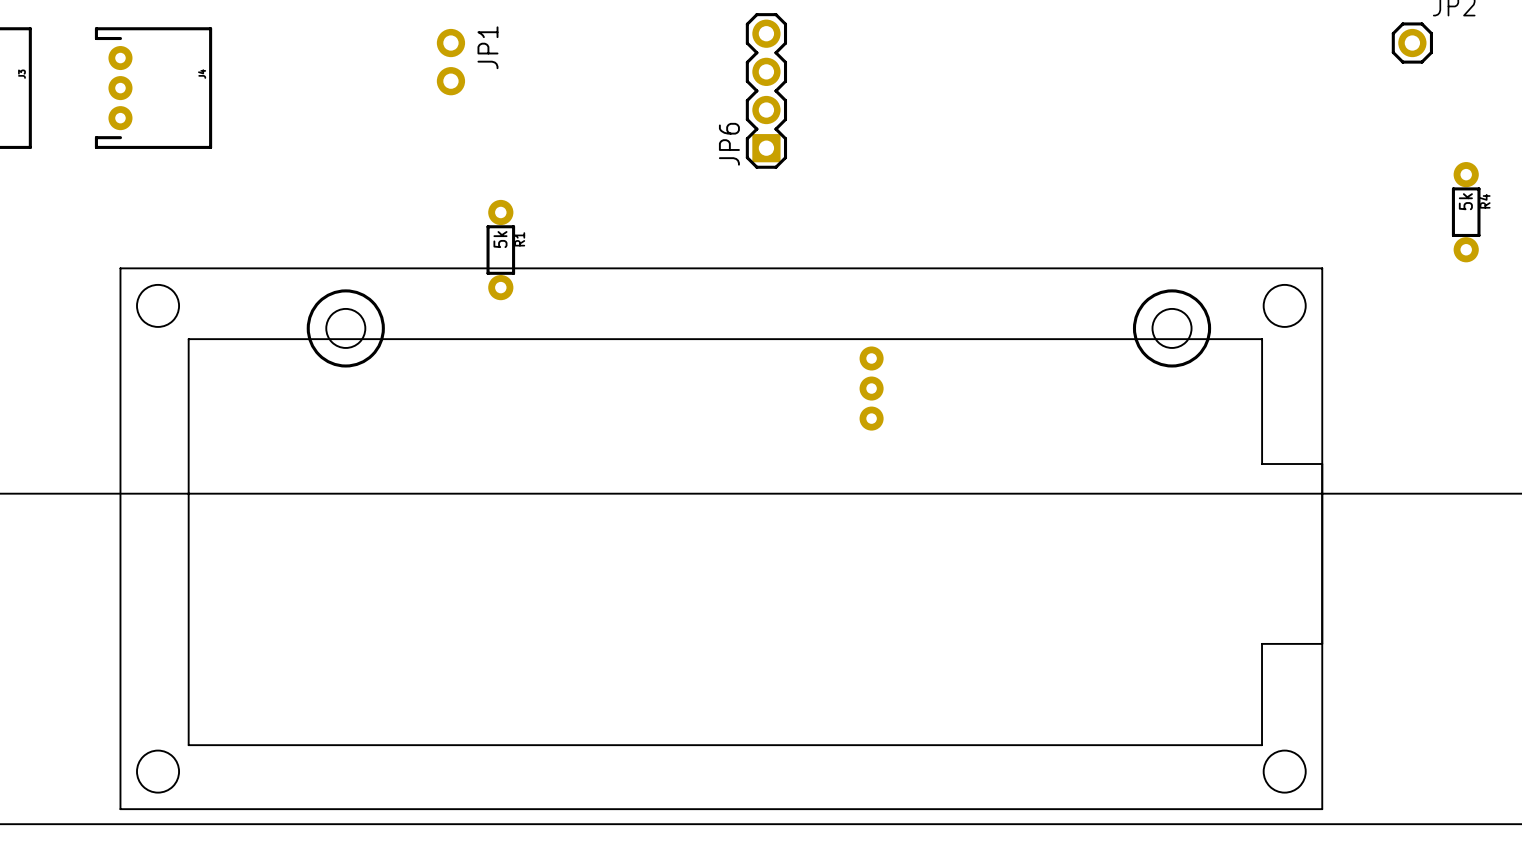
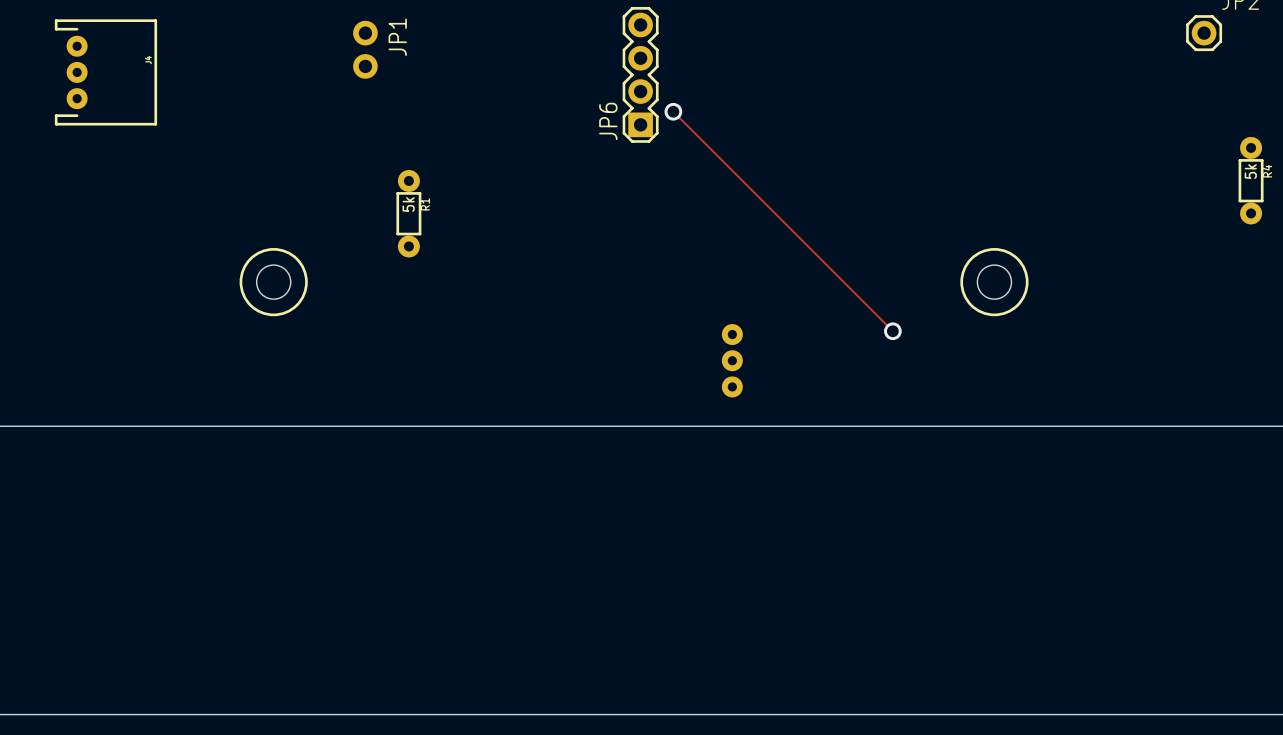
track: none -> (673, 111) (892, 331)
via: none -> (673, 111)
via: none -> (892, 331)
part position: (871, 388) -> (732, 360)
part: (721, 538) -> none

